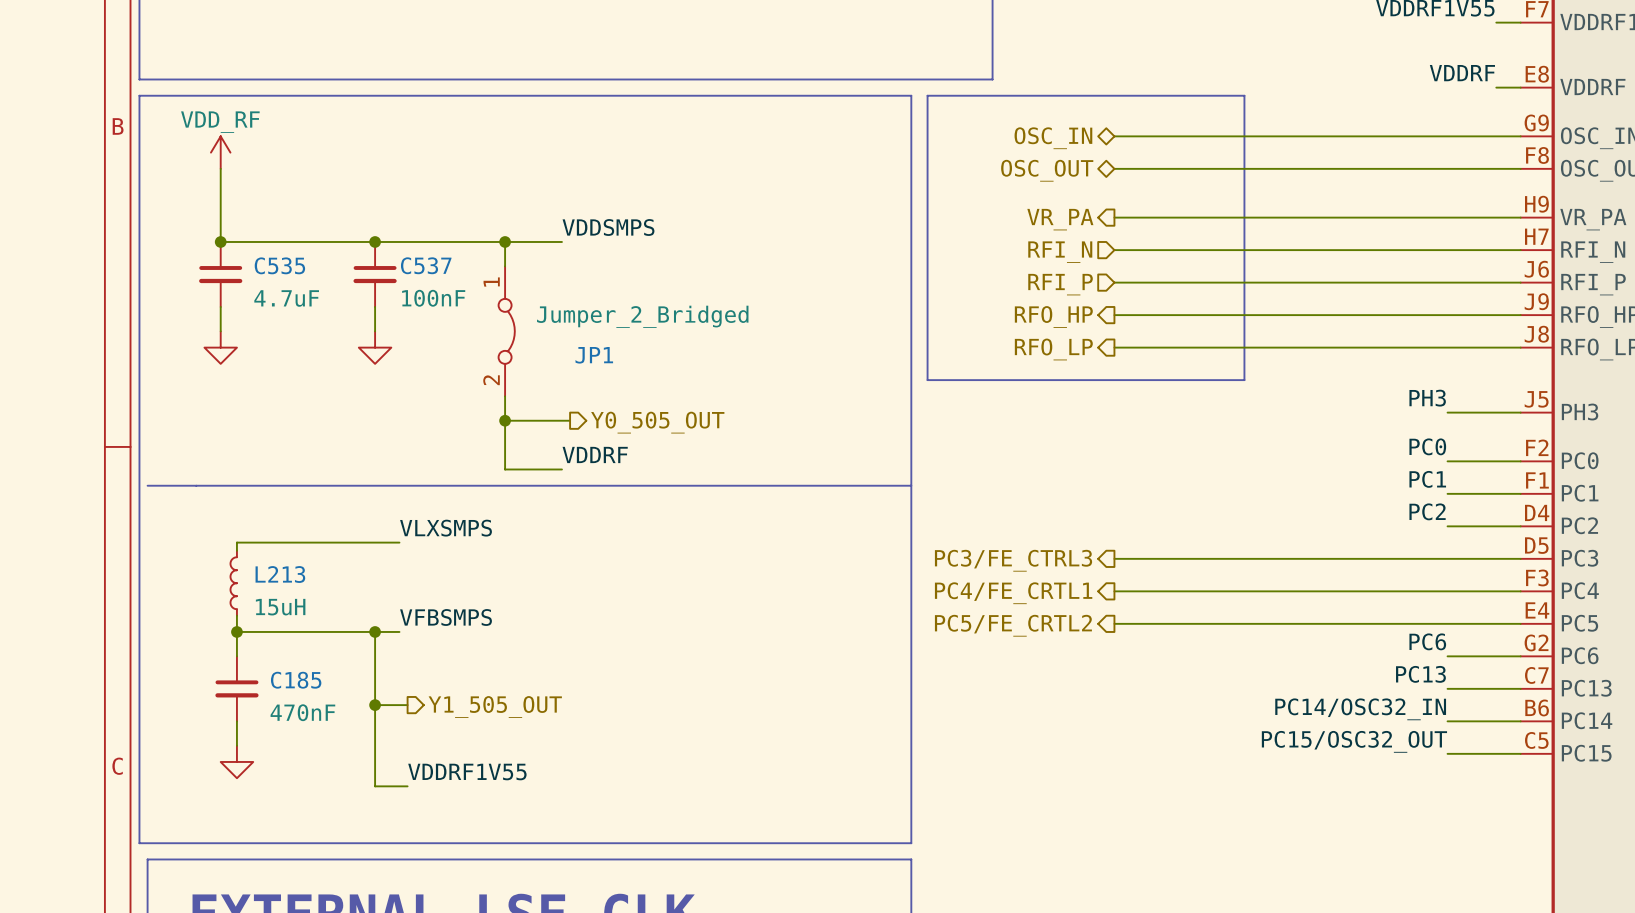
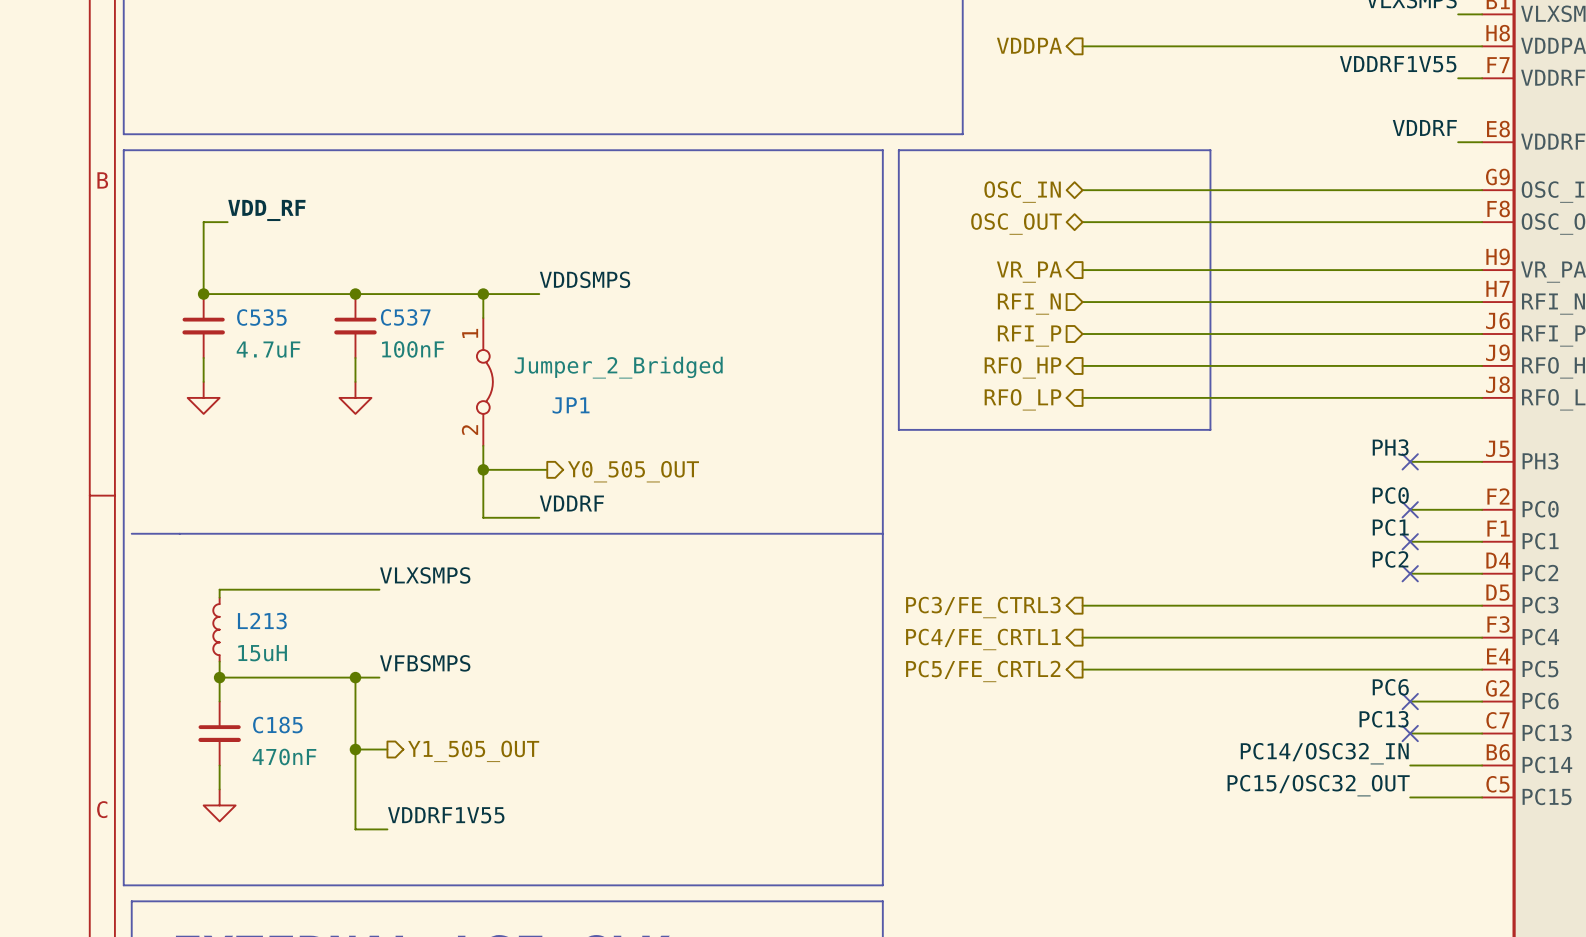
power symbol: VDD_RF (220, 152) -> none
label: none -> VDD_RF (266, 210)
wire: none -> (203, 222) (227, 222)
no-connect mark: none -> (1410, 461)
no-connect mark: none -> (1410, 509)
no-connect mark: none -> (1410, 541)
no-connect mark: none -> (1410, 573)
no-connect mark: none -> (1410, 701)
no-connect mark: none -> (1410, 733)

